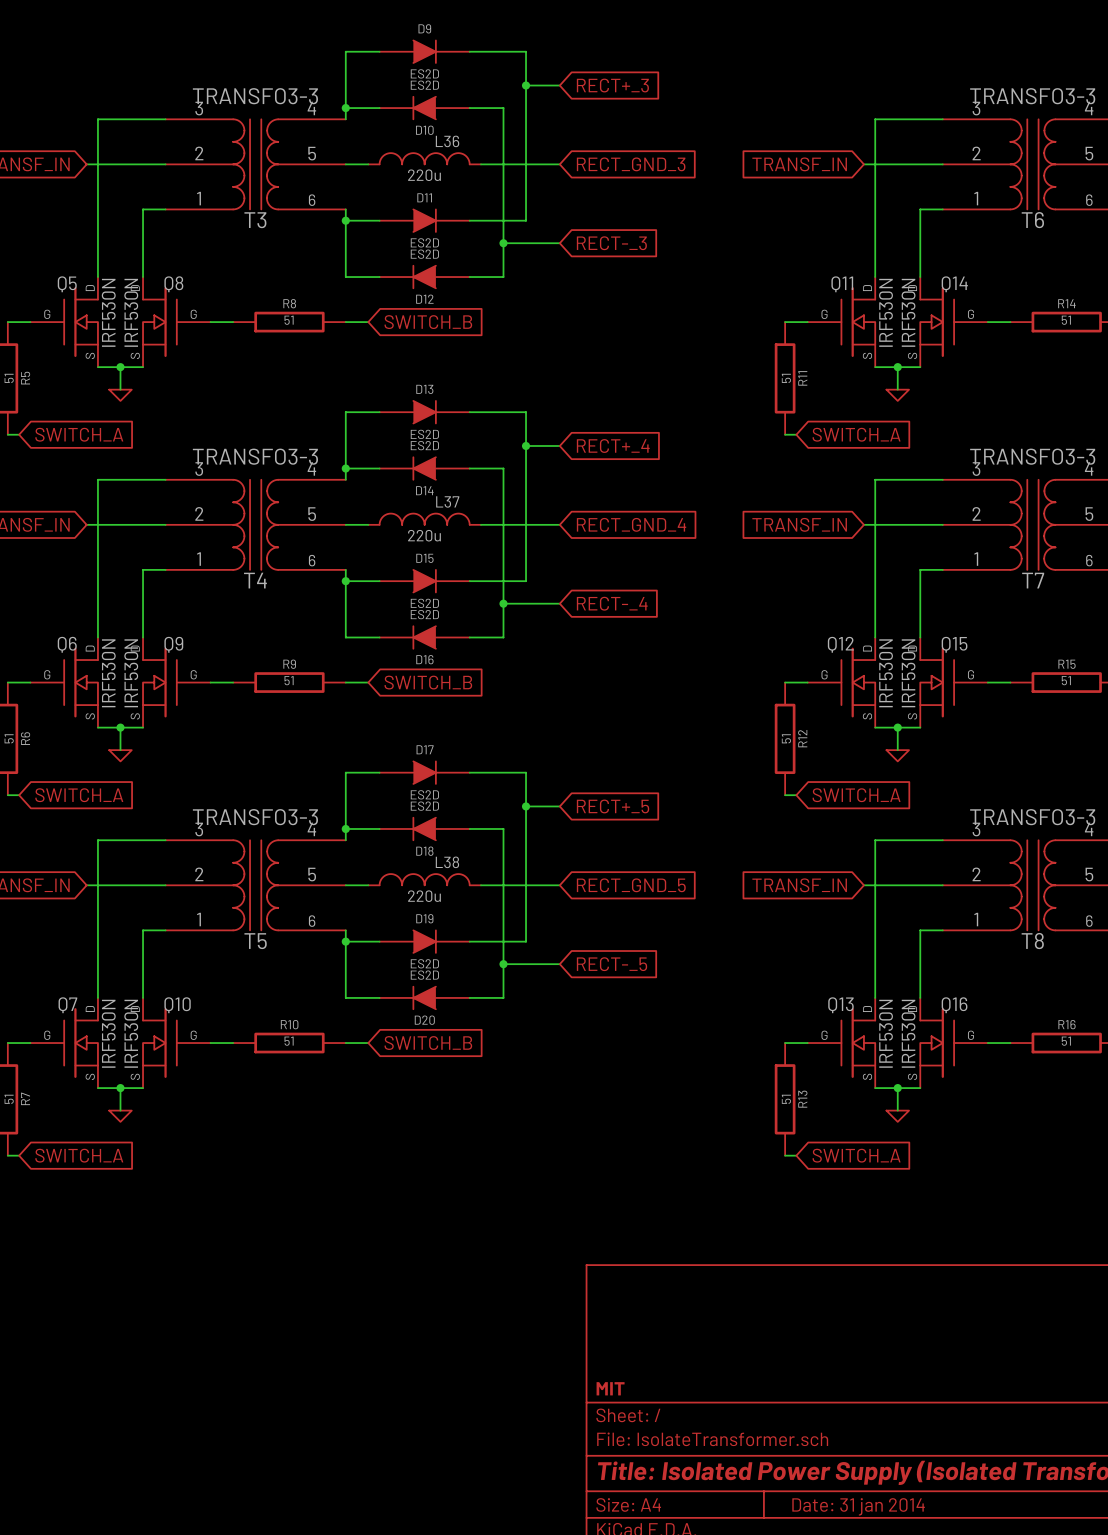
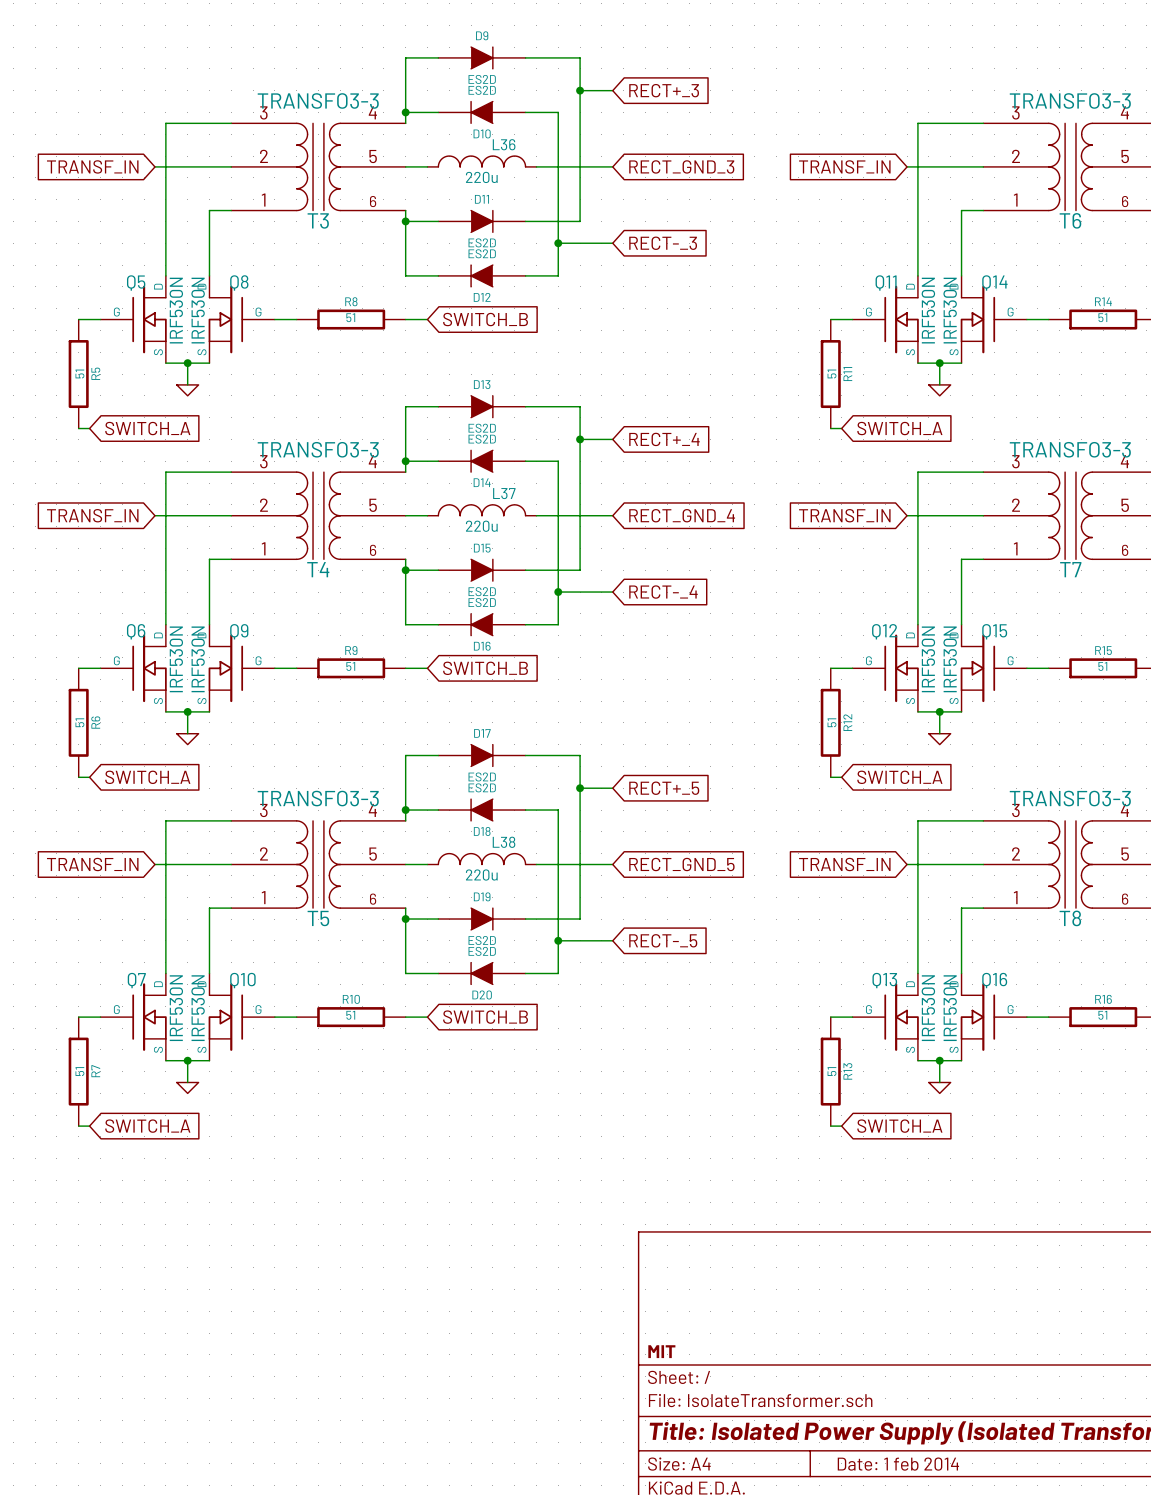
title block: Date: 31 jan 2014 (858, 1506) -> Date: 1 feb 2014 (898, 1464)

